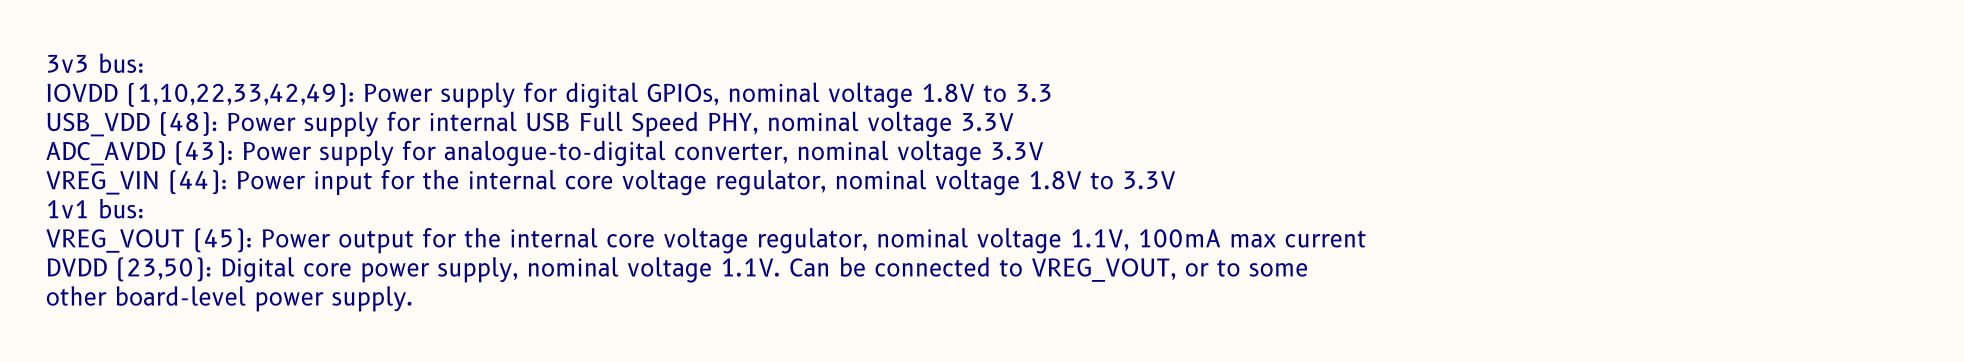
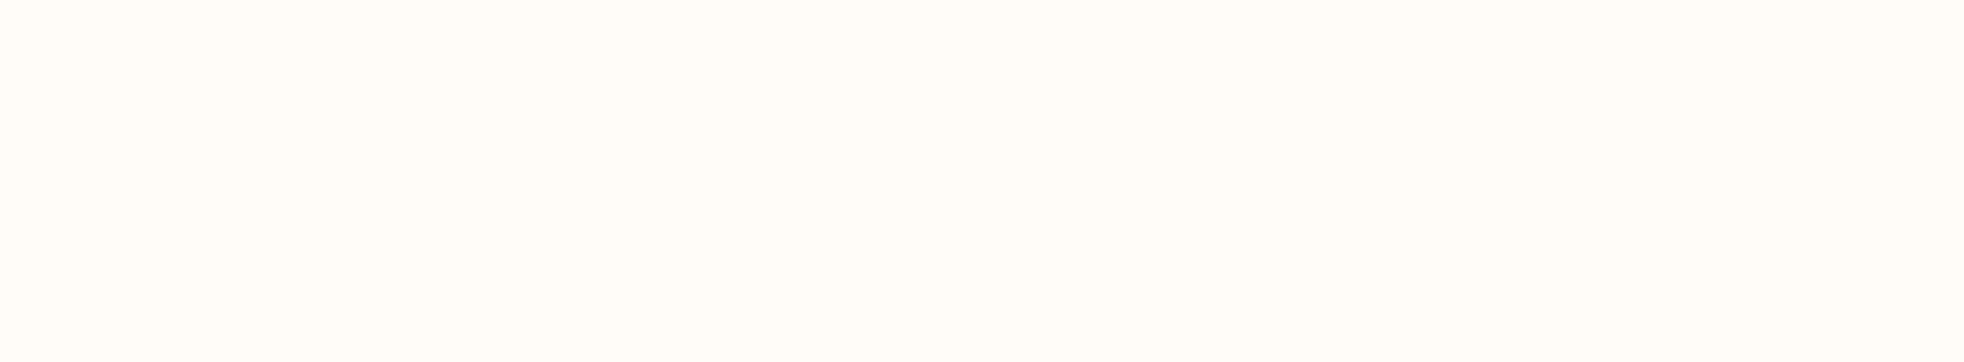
text: 3v3 bus: (95, 63) -> none
text: IOVDD (1,10,22,33,42,49): Power supply for digital GPIOs, nominal voltage 1.8V to 3.3 (549, 95) -> none
text: USB_VDD (48): Power supply for internal USB Full Speed PHY, nominal voltage 3.3V (530, 124) -> none
text: ADC_AVDD (43): Power supply for analogue-to-digital converter, nominal voltage 3.3V (544, 153) -> none
text: VREG_VIN (44): Power input for the internal core voltage regulator, nominal voltage 1.8V to 3.3V (610, 182) -> none
text: 1v1 bus: (95, 208) -> none
text: VREG_VOUT (45): Power output for the internal core voltage regulator, nominal voltage 1.1V, 100mA max current (706, 240) -> none
text: DVDD (23,50): Digital core power supply, nominal voltage 1.1V. Can be connected to VREG_VOUT, or to some (677, 269) -> none
text: other board-level power supply. (229, 298) -> none

